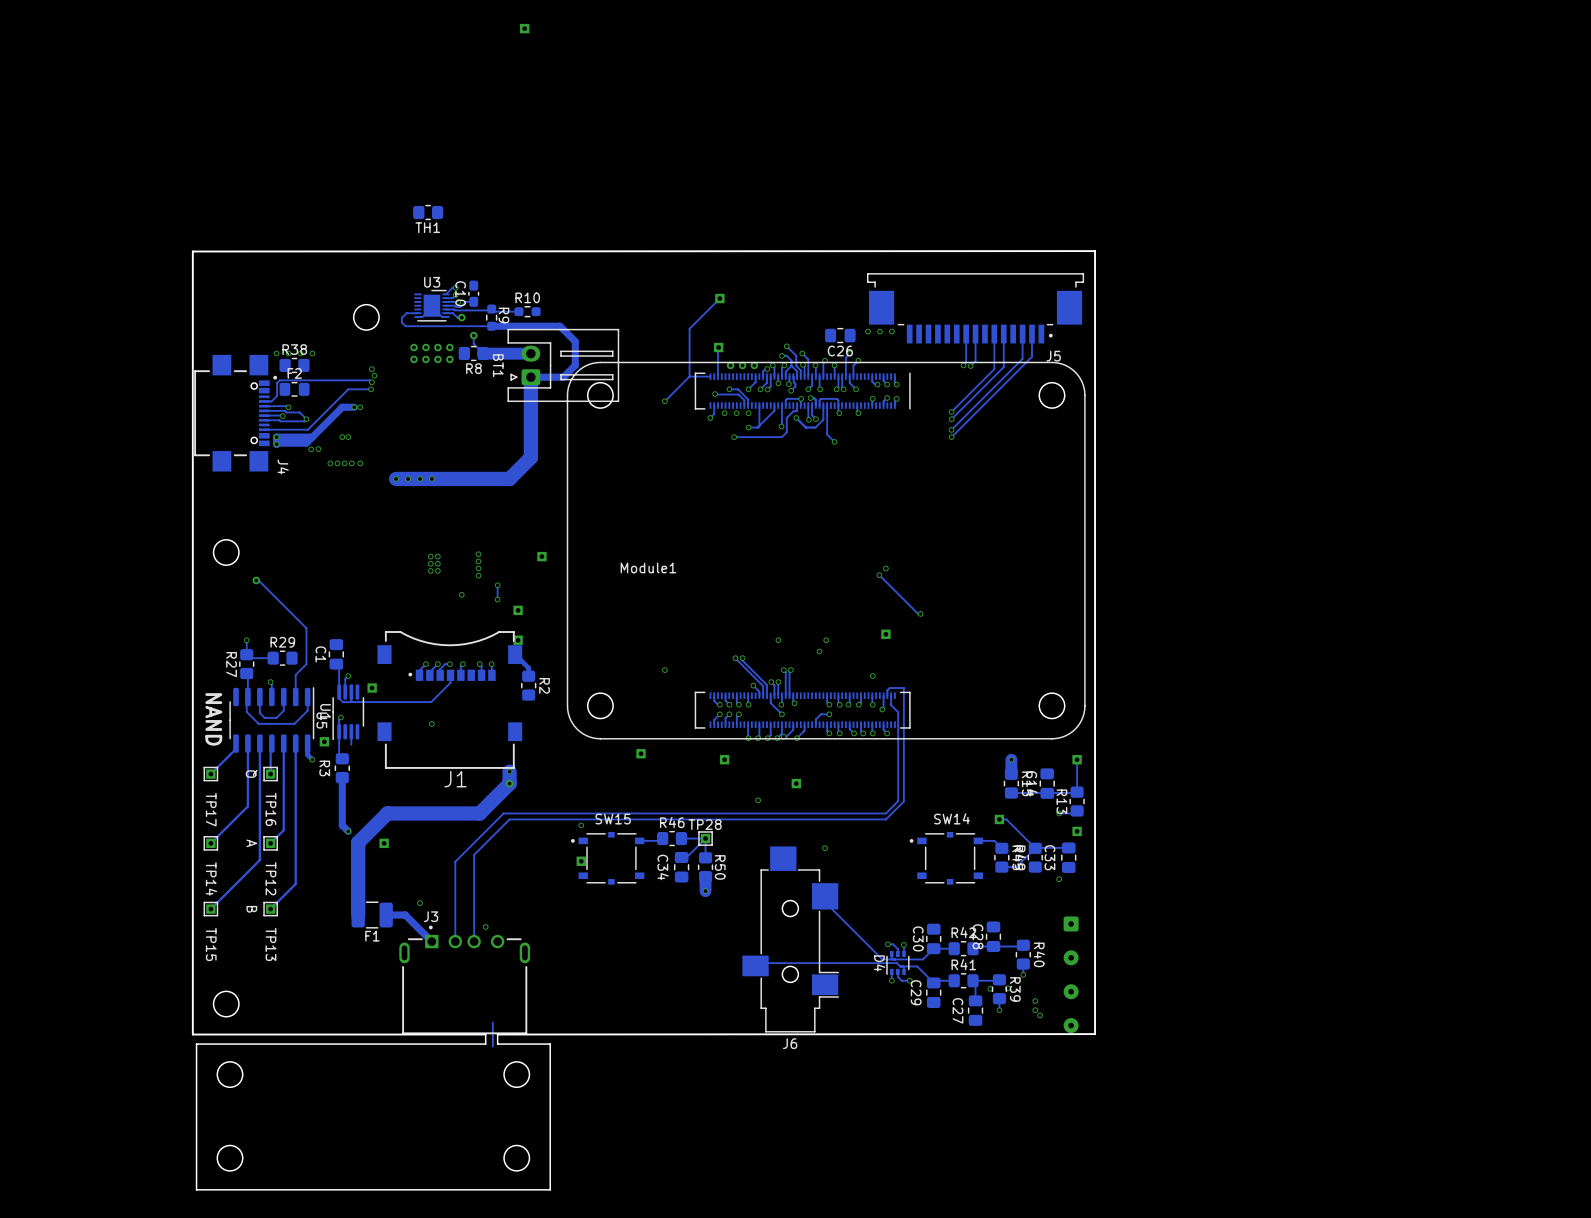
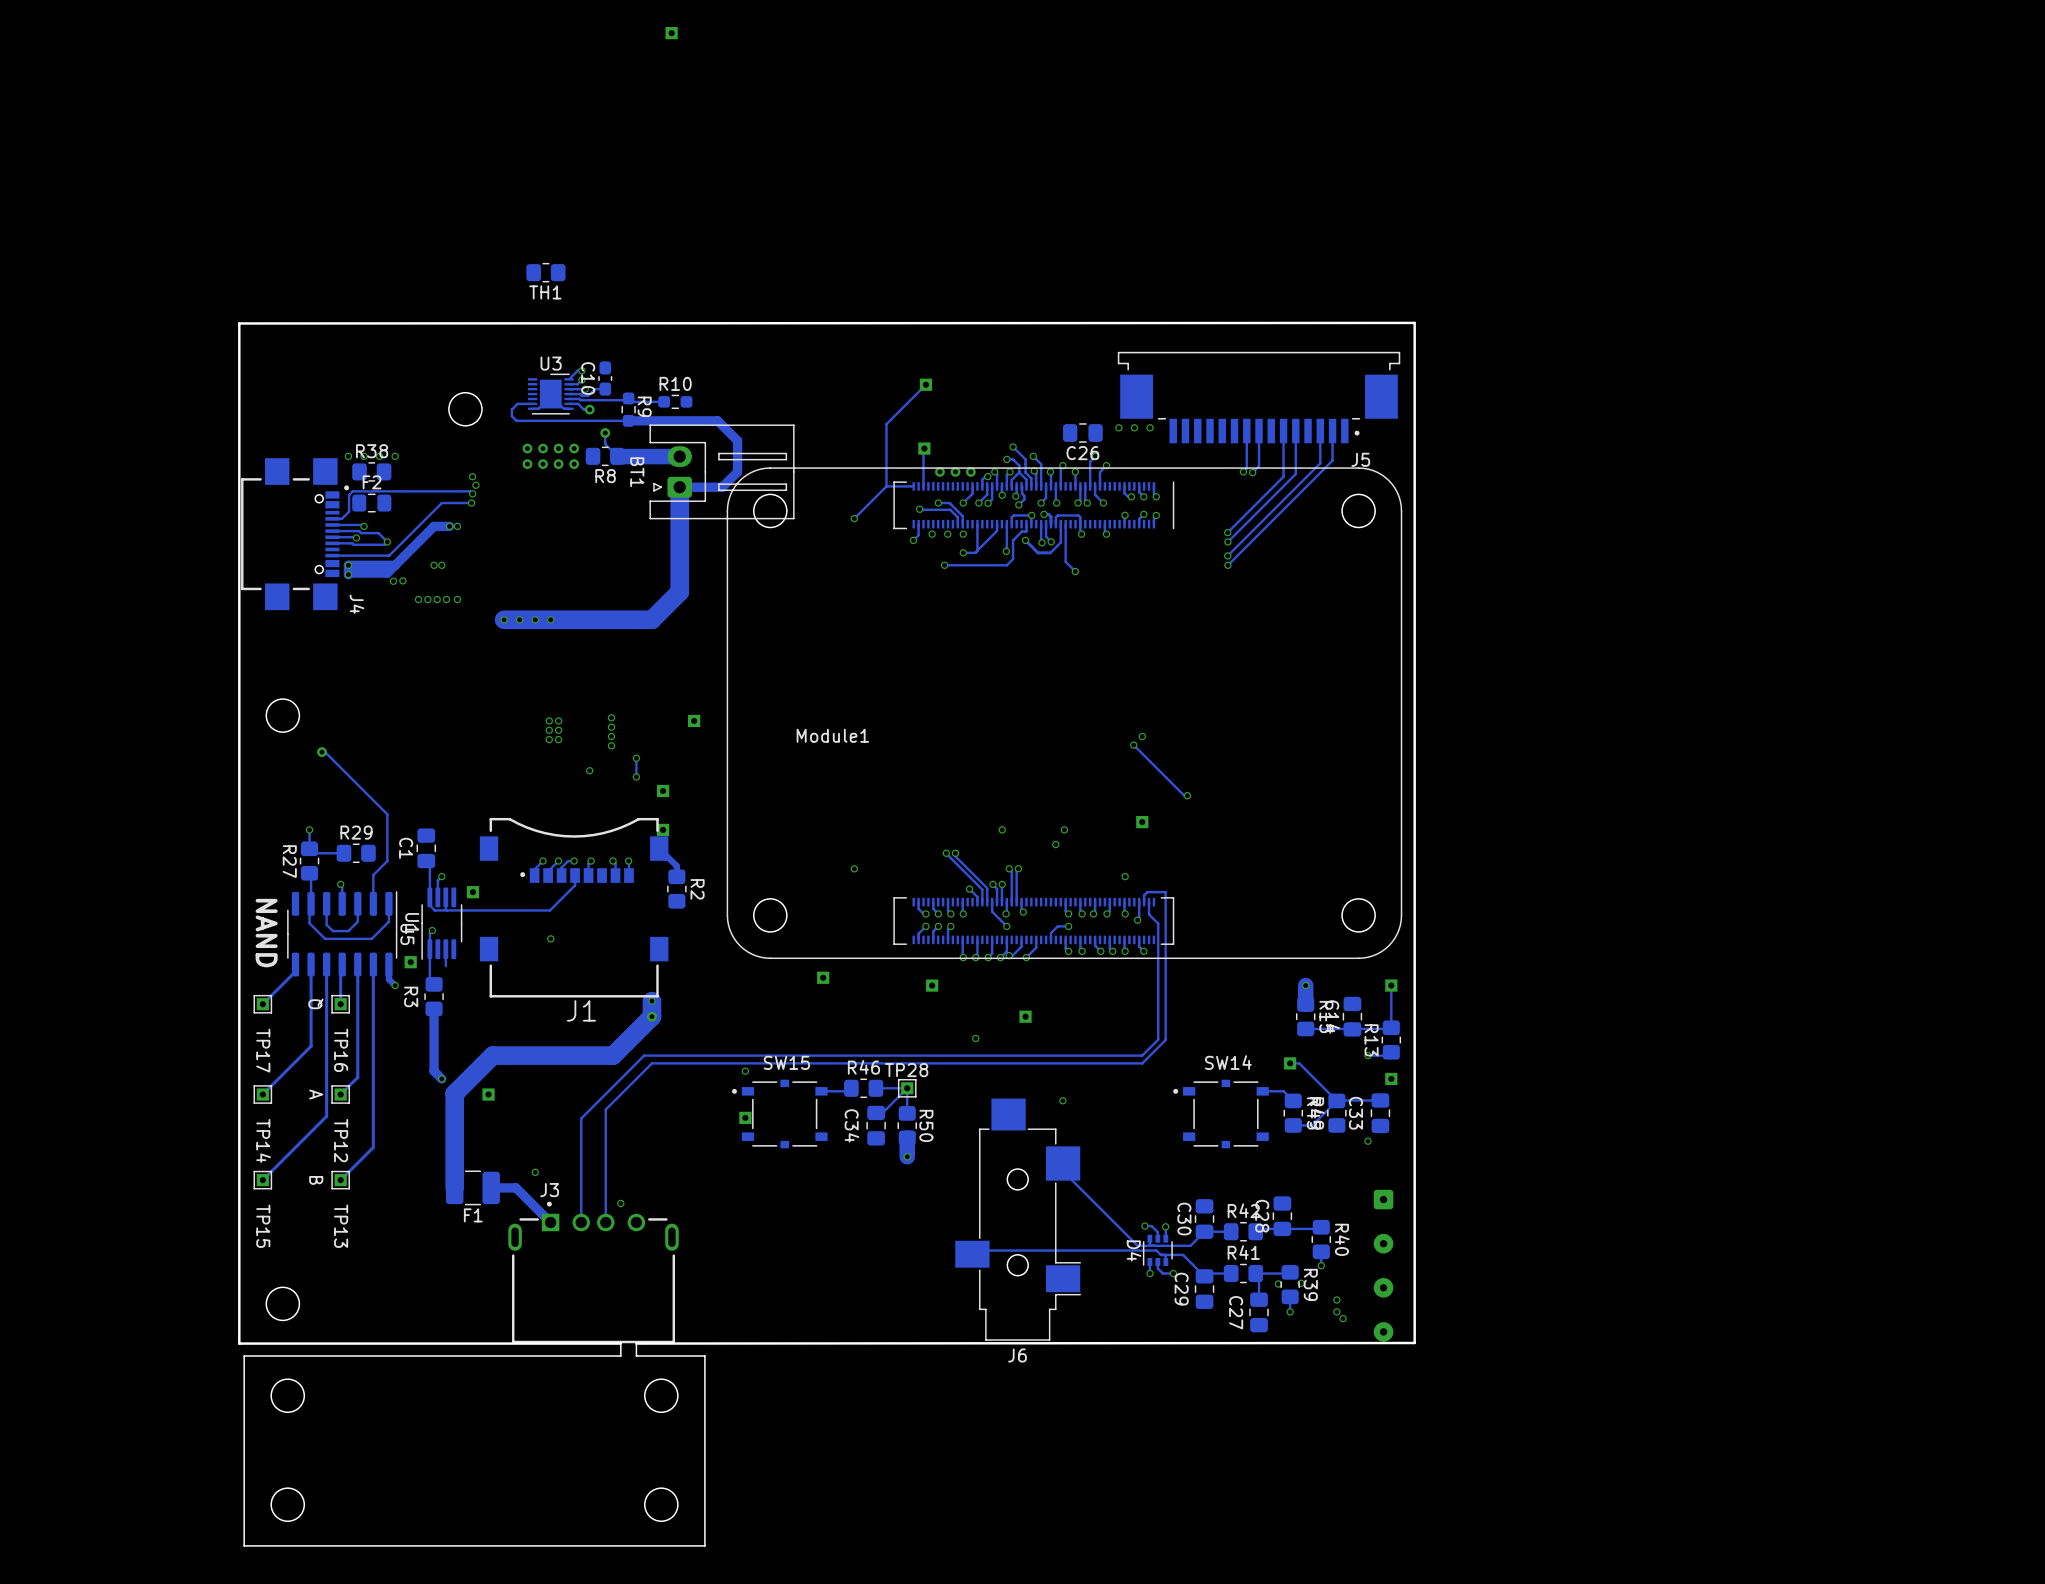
track: (492, 1022) (492, 1046) -> none

